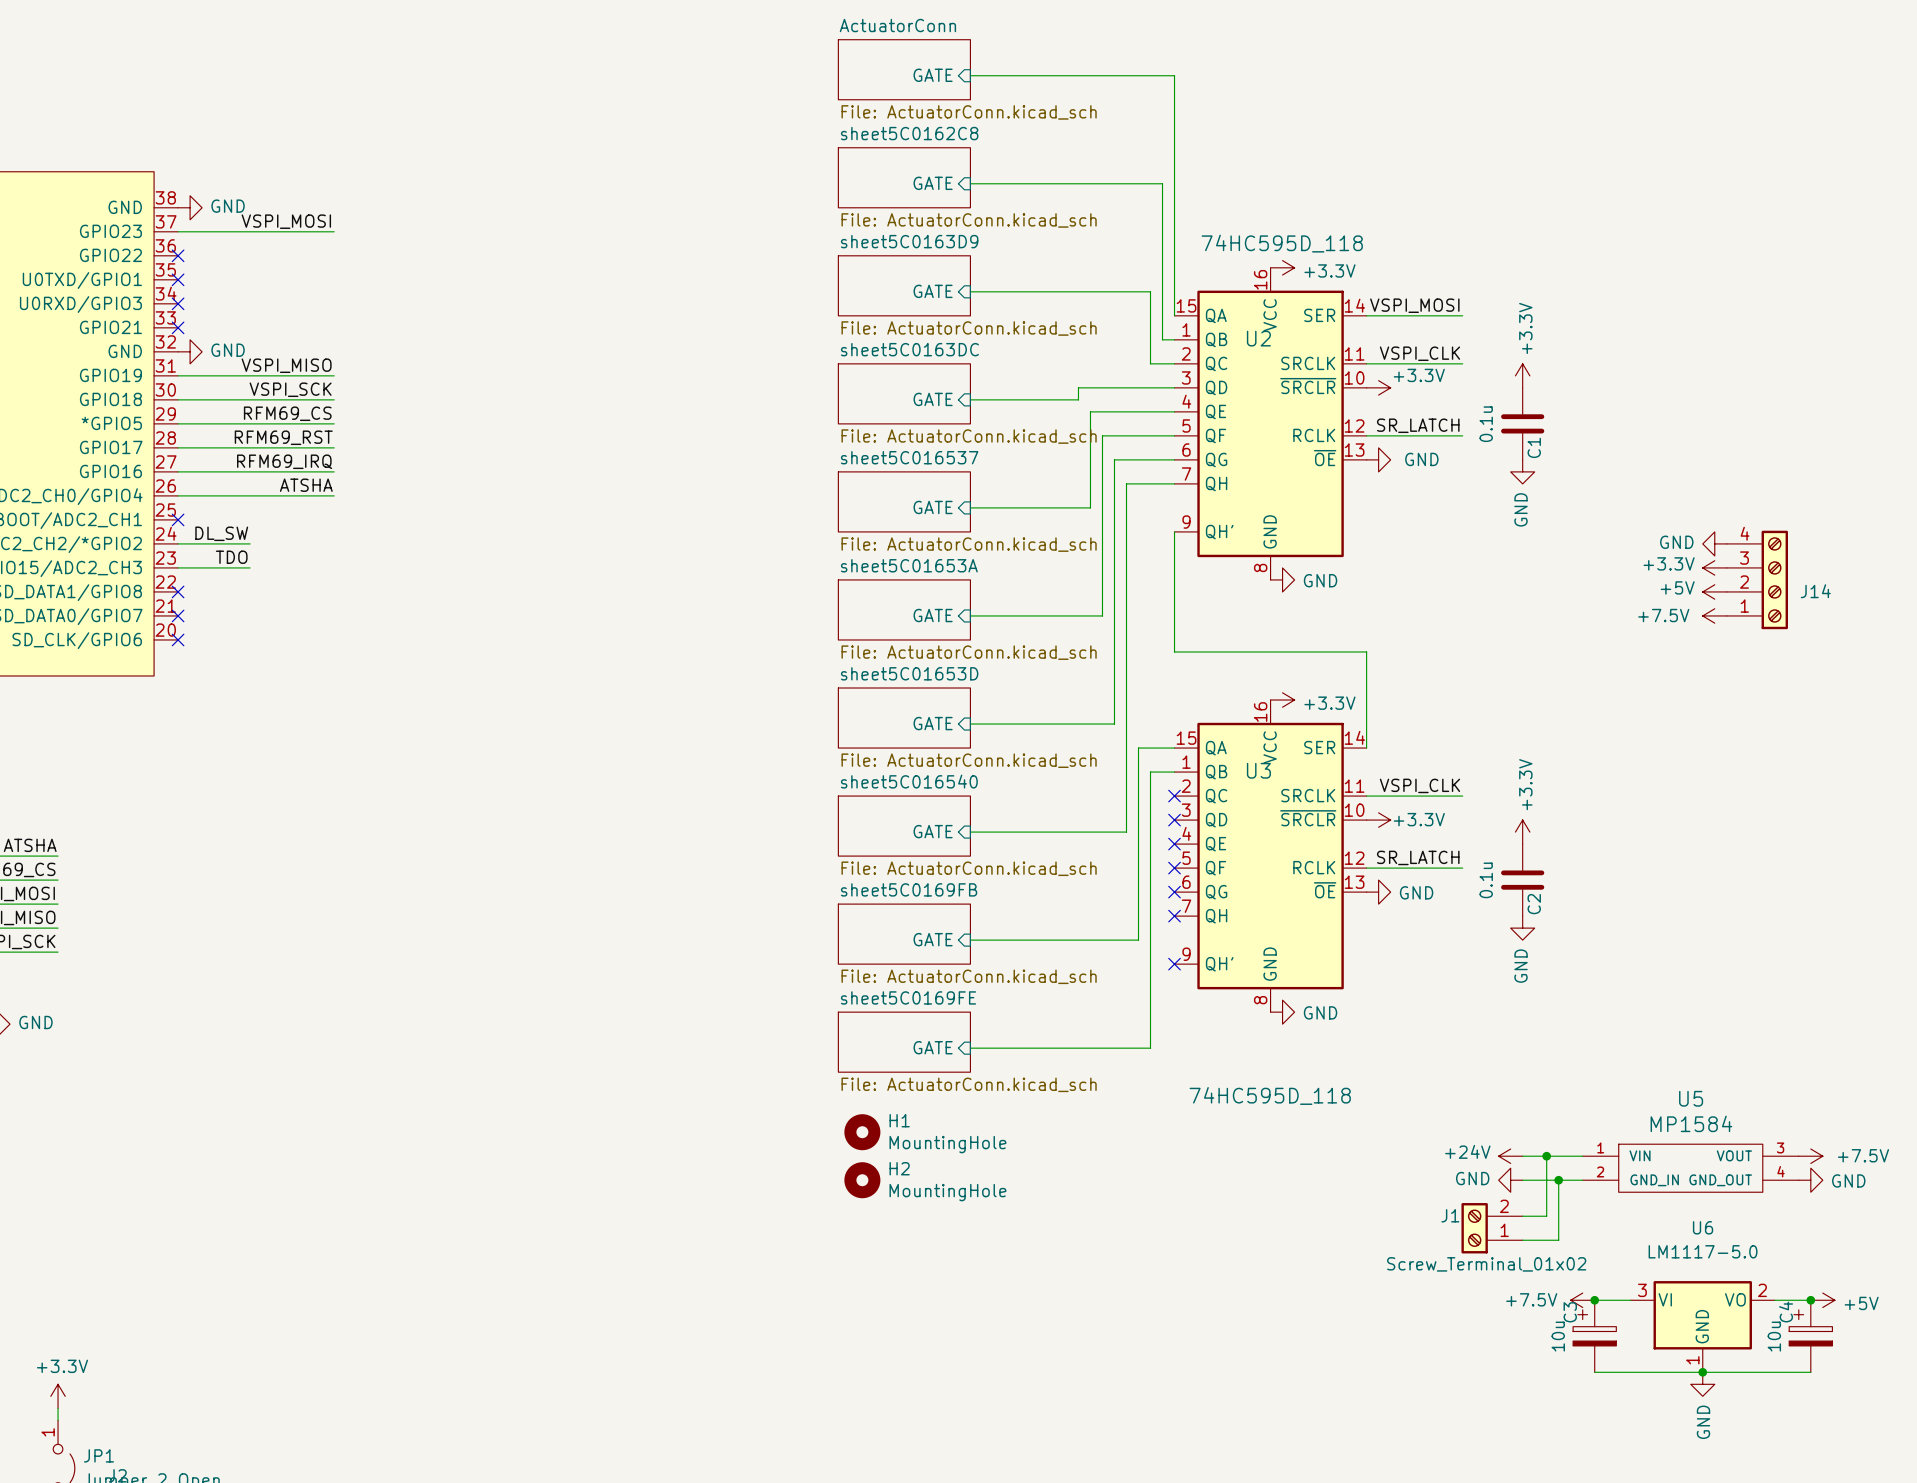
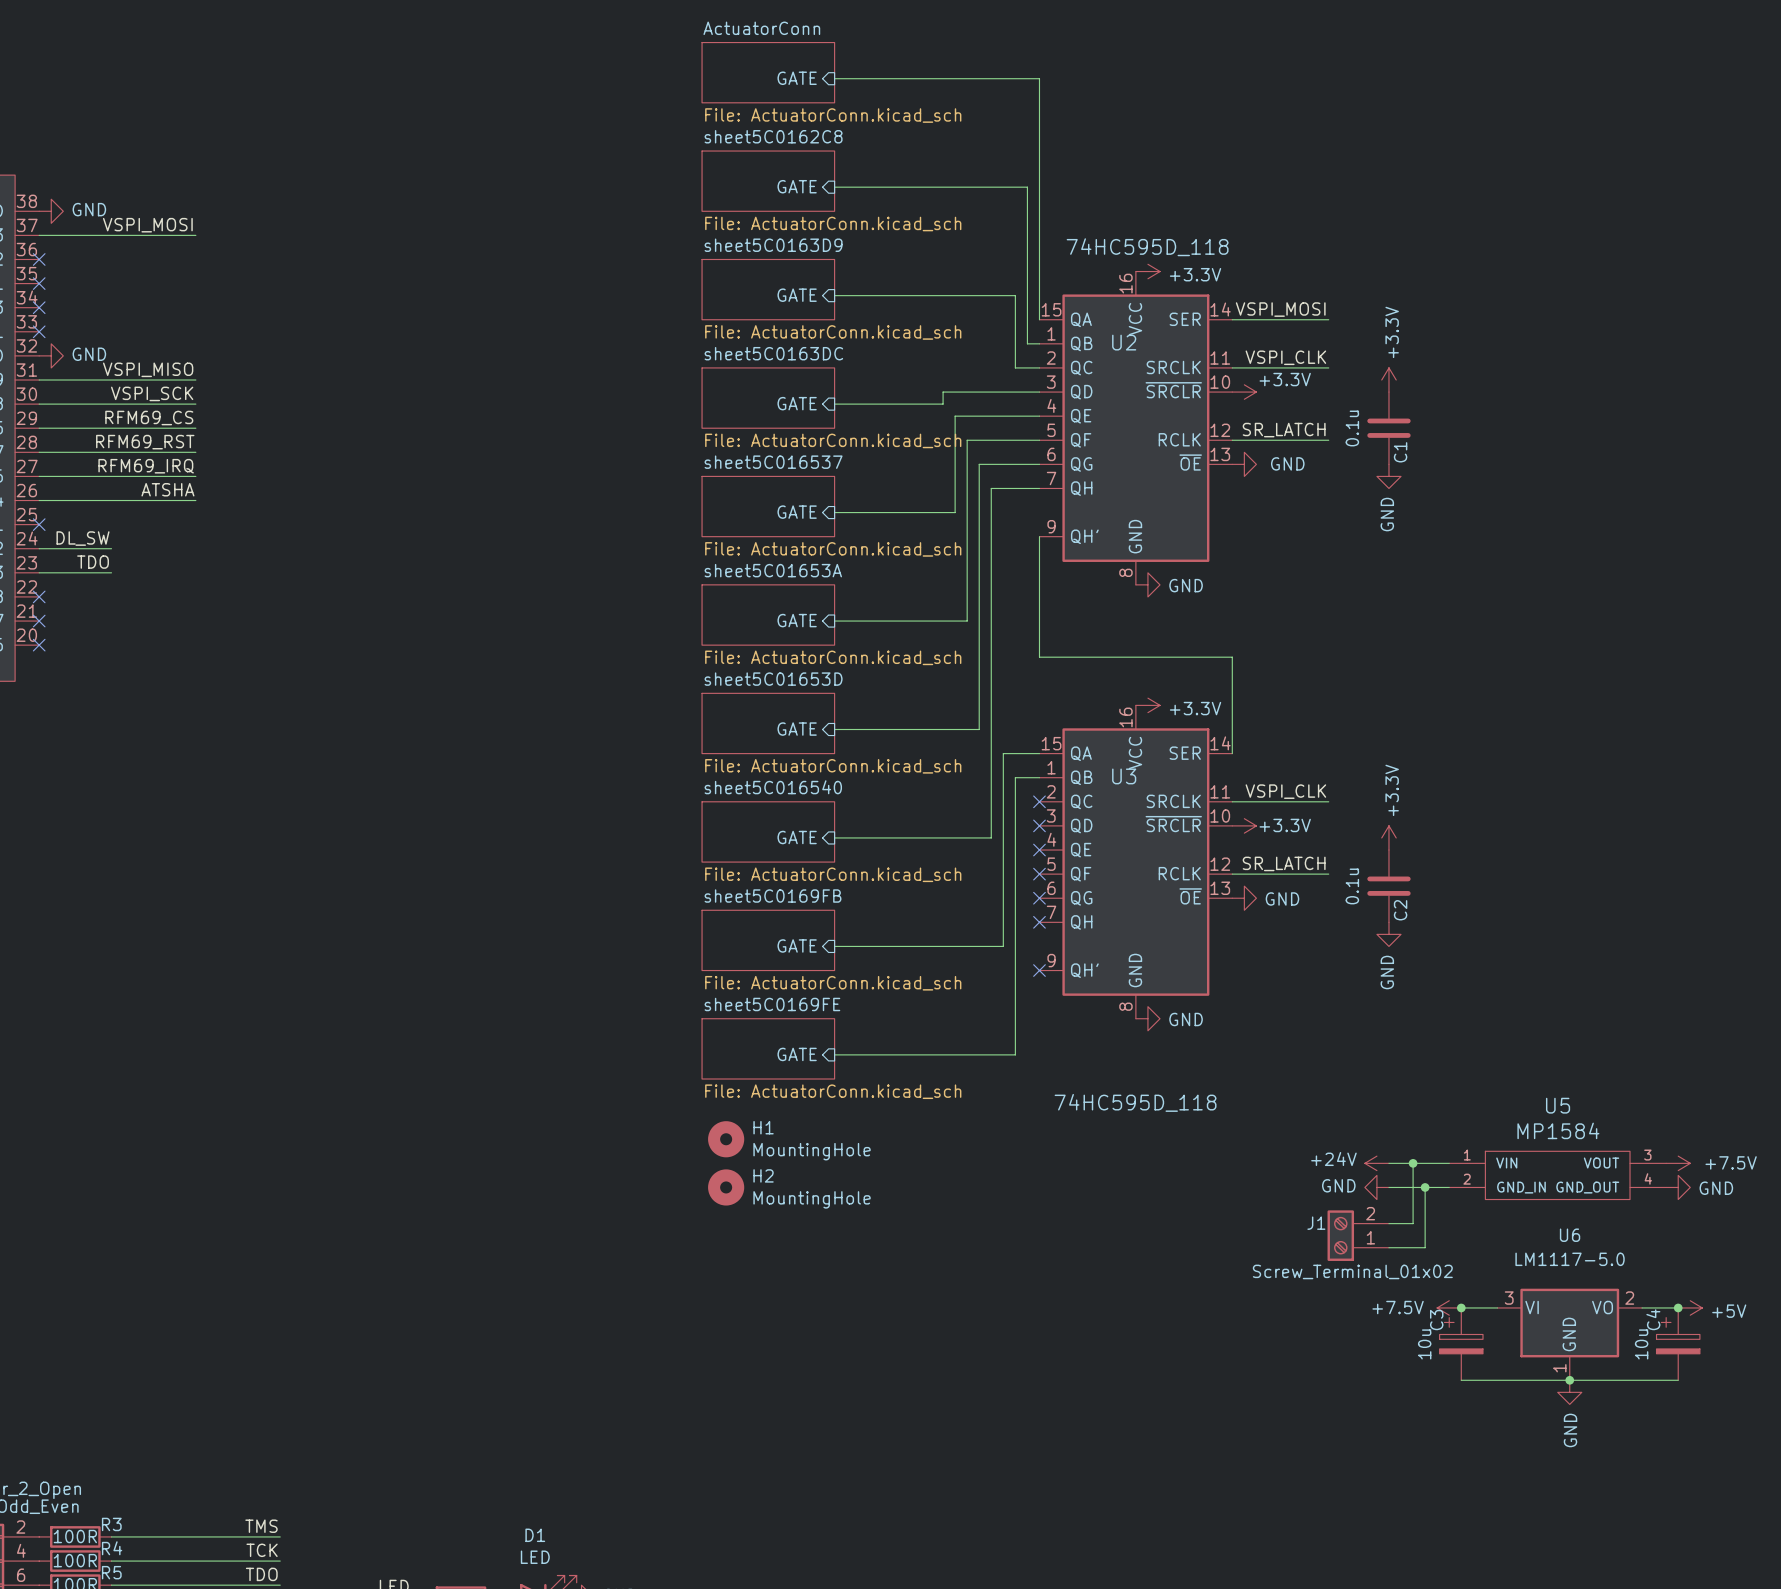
power symbol: GND (1714, 543) -> none
power symbol: +3.3V (1714, 567) -> none
J14: (1757, 579) -> none
power symbol: +5V (1714, 591) -> none
power symbol: +7.5V (1714, 615) -> none

